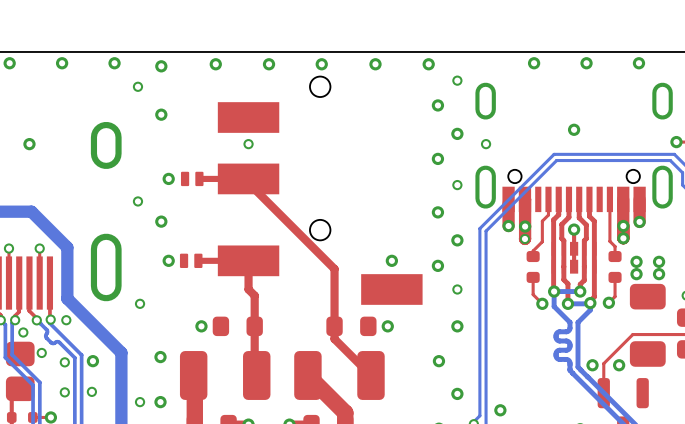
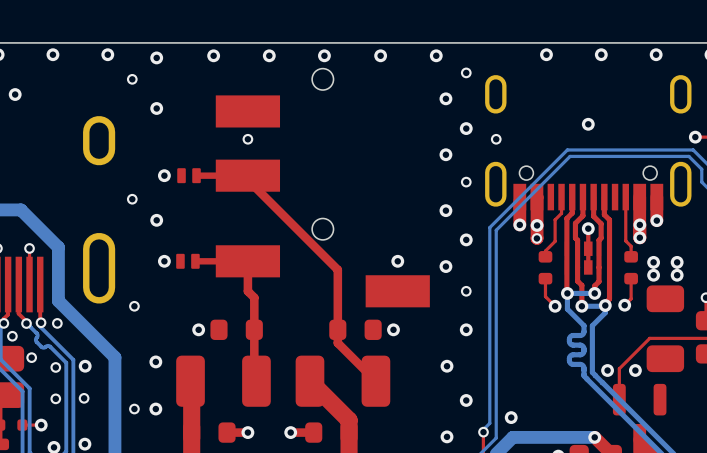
via position: (29, 144) -> (15, 94)

